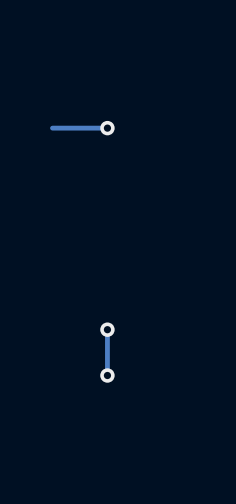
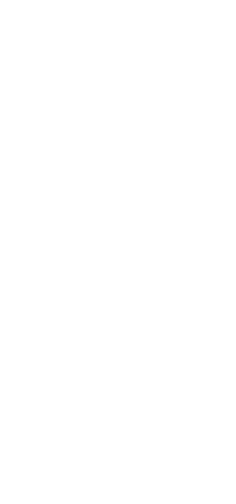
track: (107, 128) (52, 128) -> none
via: (107, 128) -> none
track: (107, 329) (107, 375) -> none
via: (107, 329) -> none
via: (107, 375) -> none

